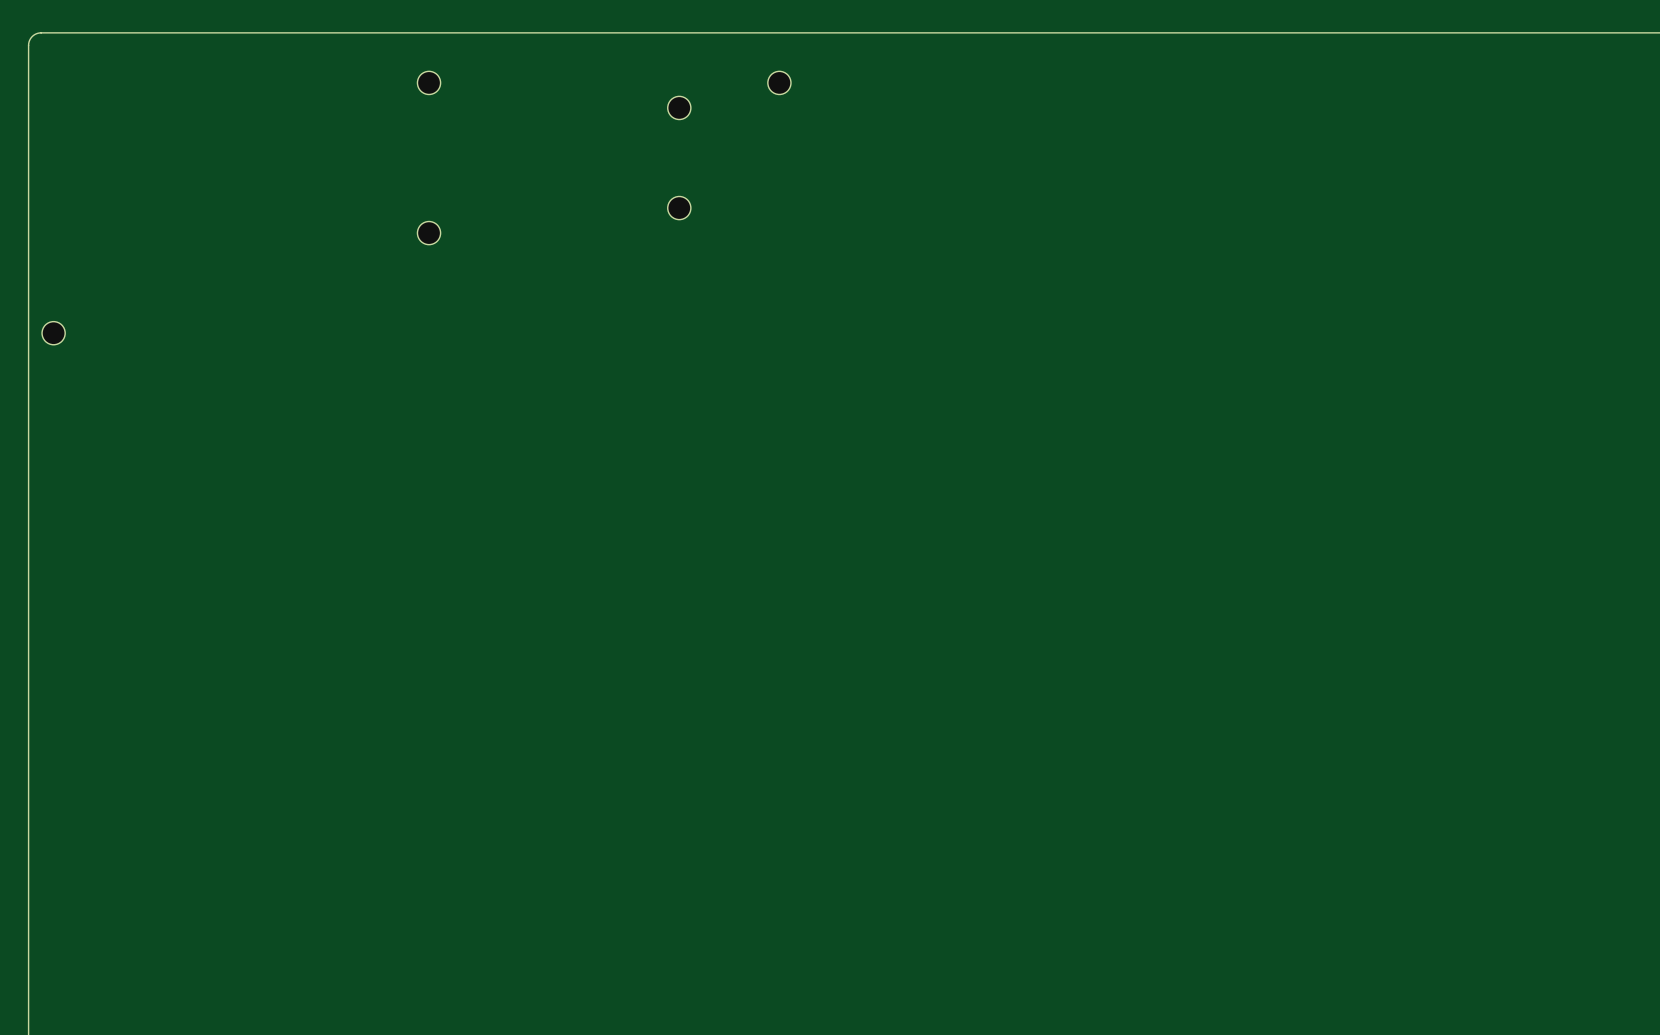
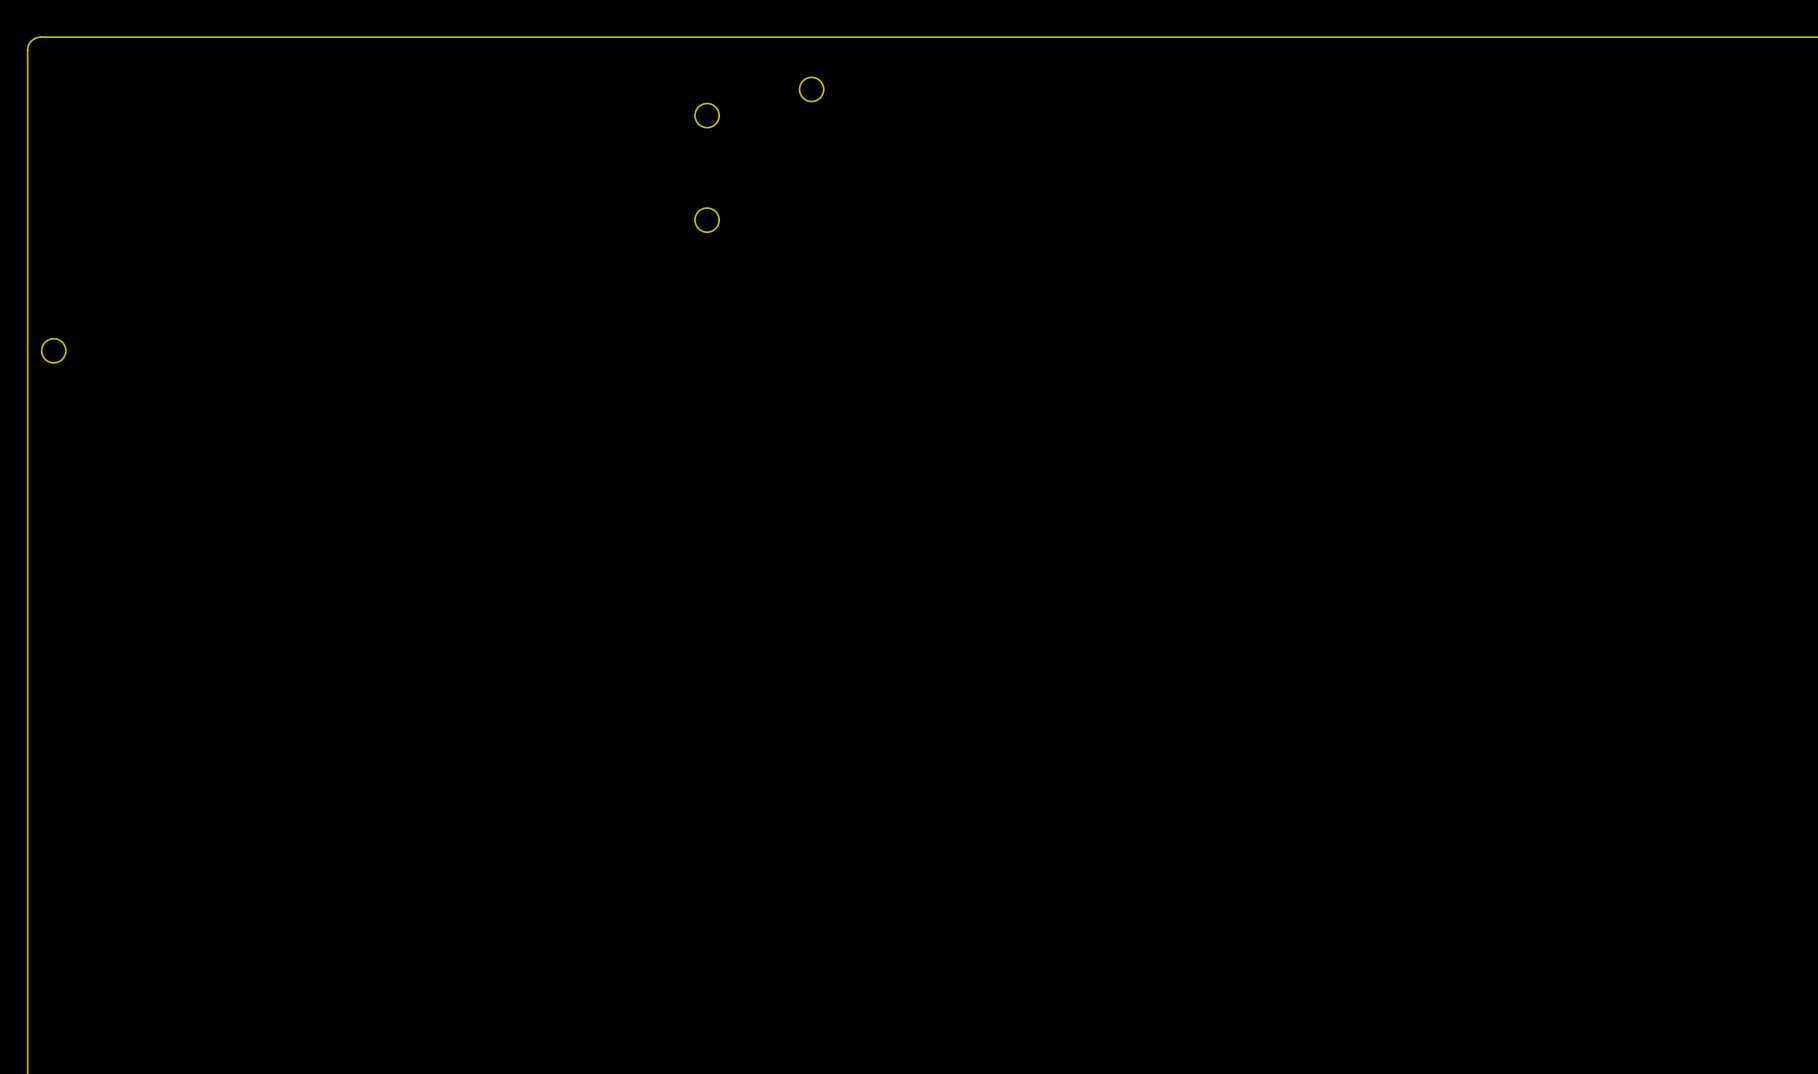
part: (429, 82) -> none
part: (429, 233) -> none

